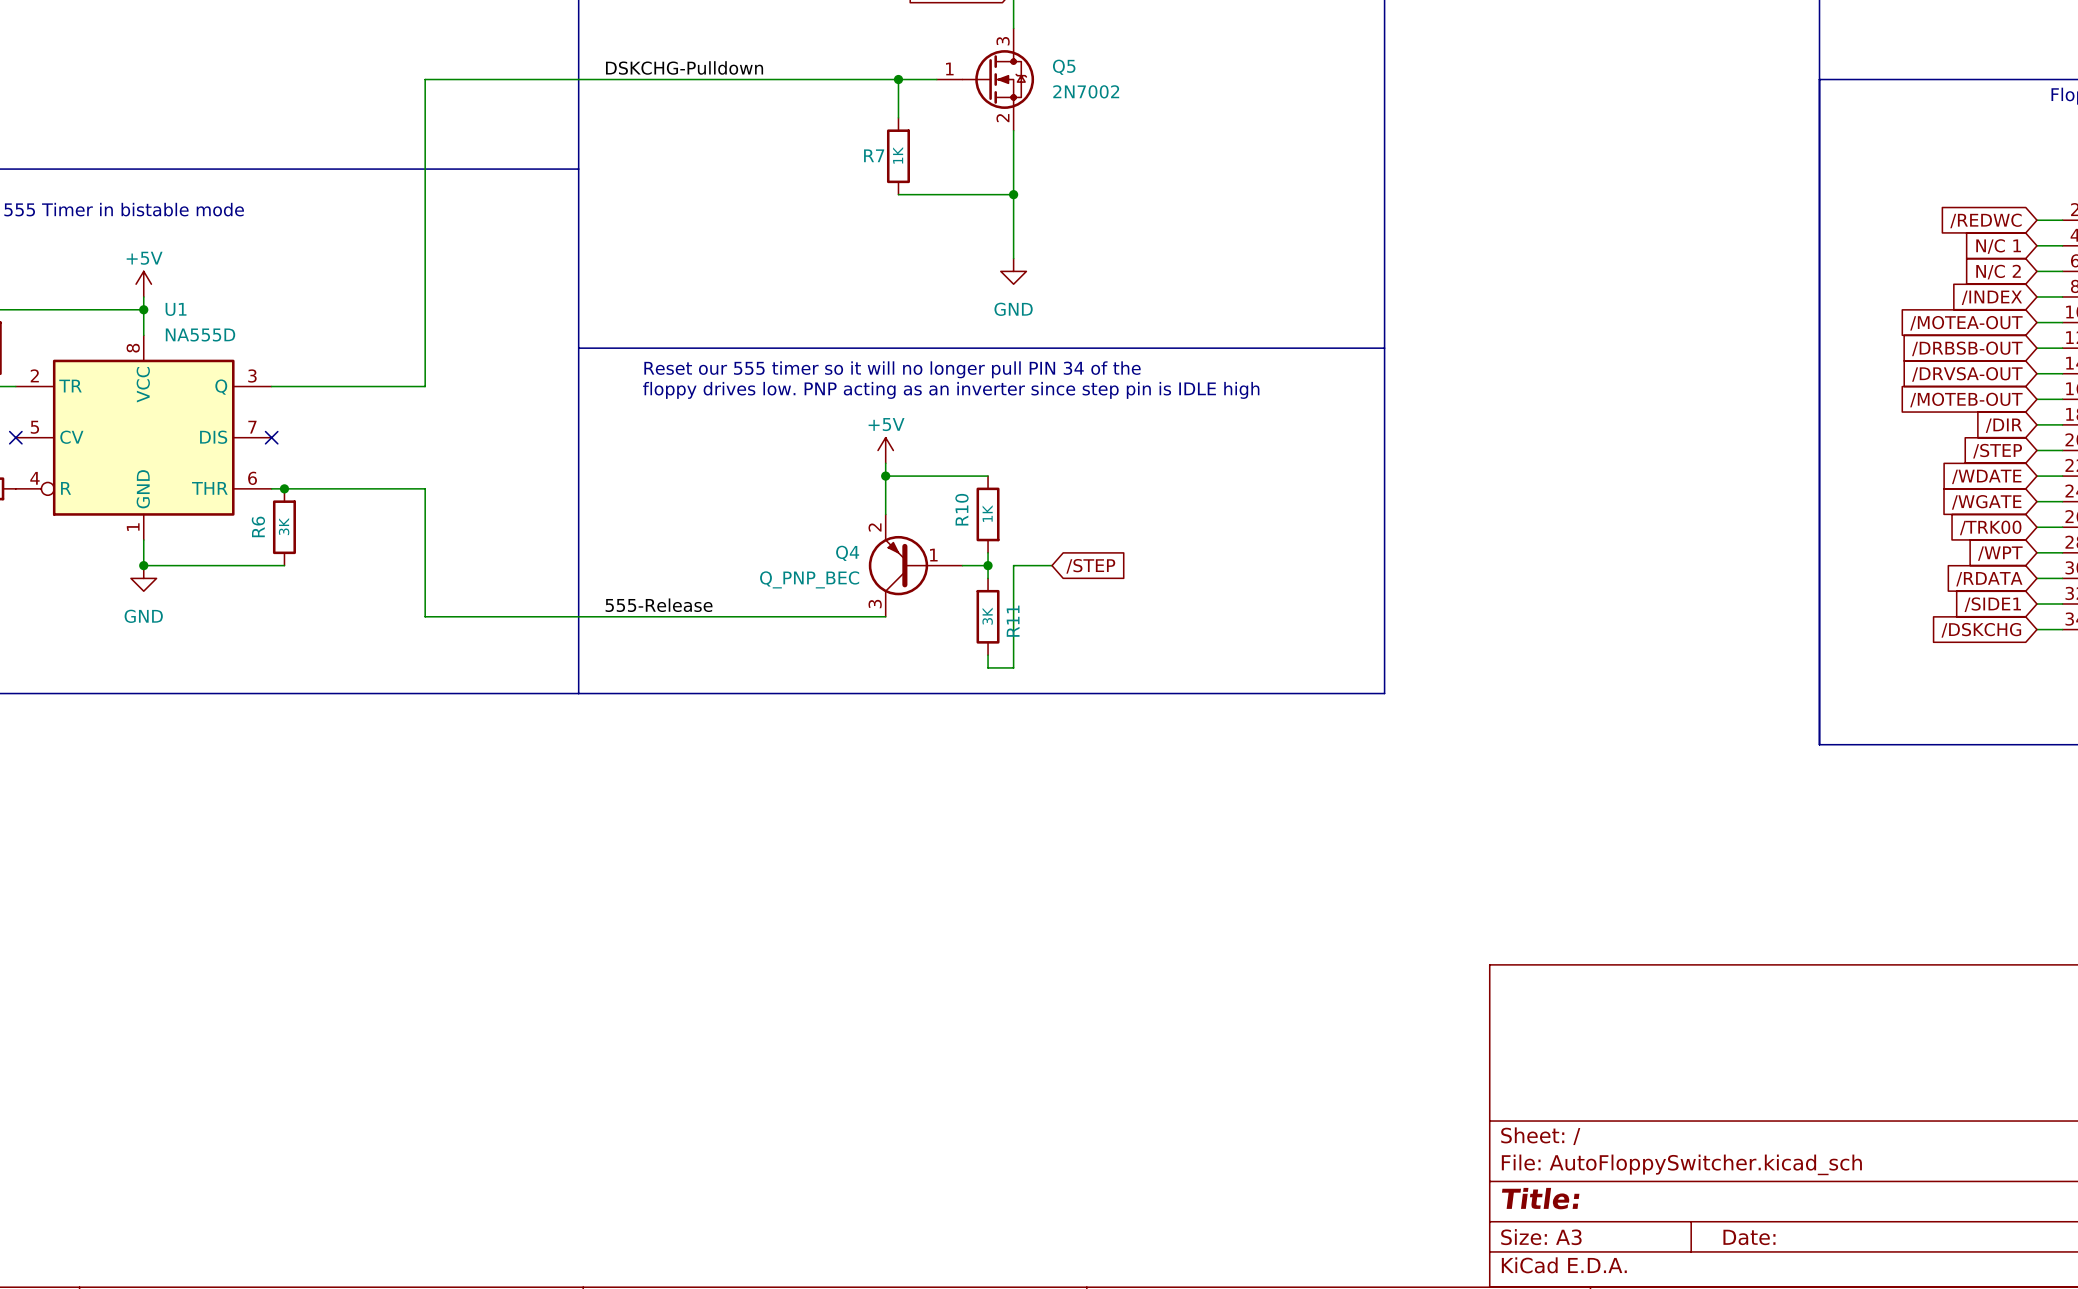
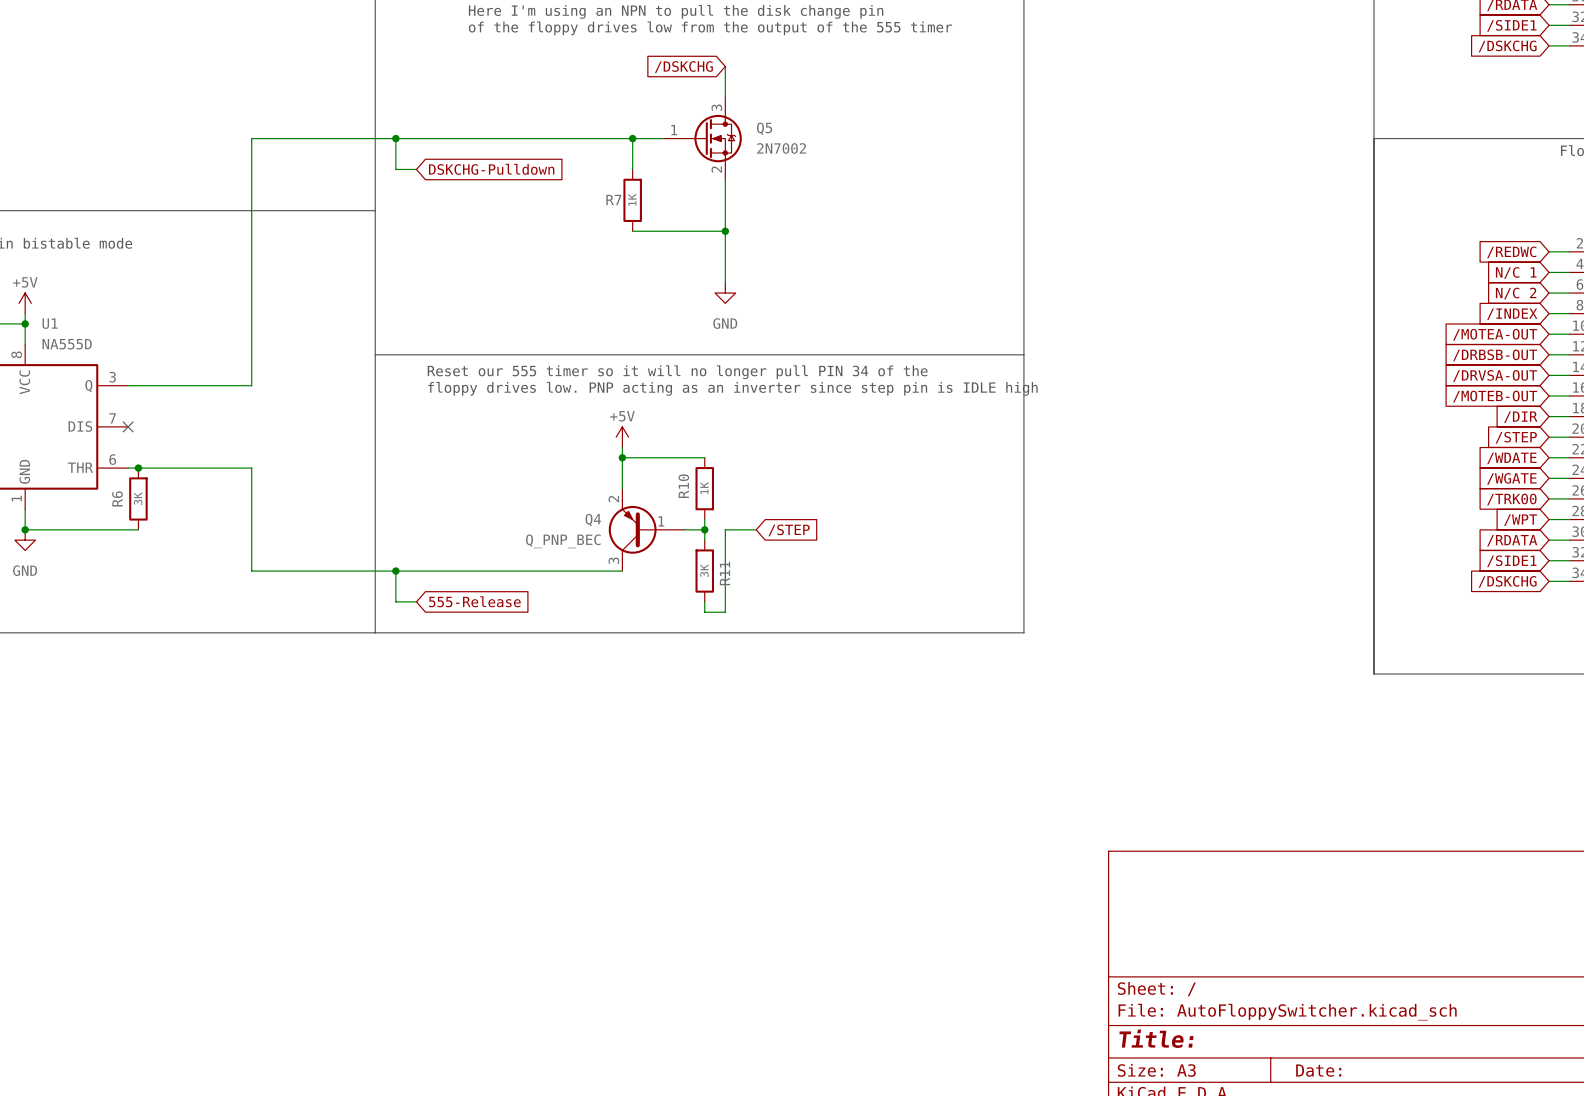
label: DSKCHG-Pulldown (684, 67) -> none
wire: none -> (395, 138) (395, 169) (416, 169)
junction: none -> (395, 138)
global label: none -> DSKCHG-Pulldown (491, 169)
label: 555-Release (659, 605) -> none
wire: none -> (395, 571) (395, 601) (416, 601)
junction: none -> (395, 571)
global label: none -> 555-Release (474, 601)

